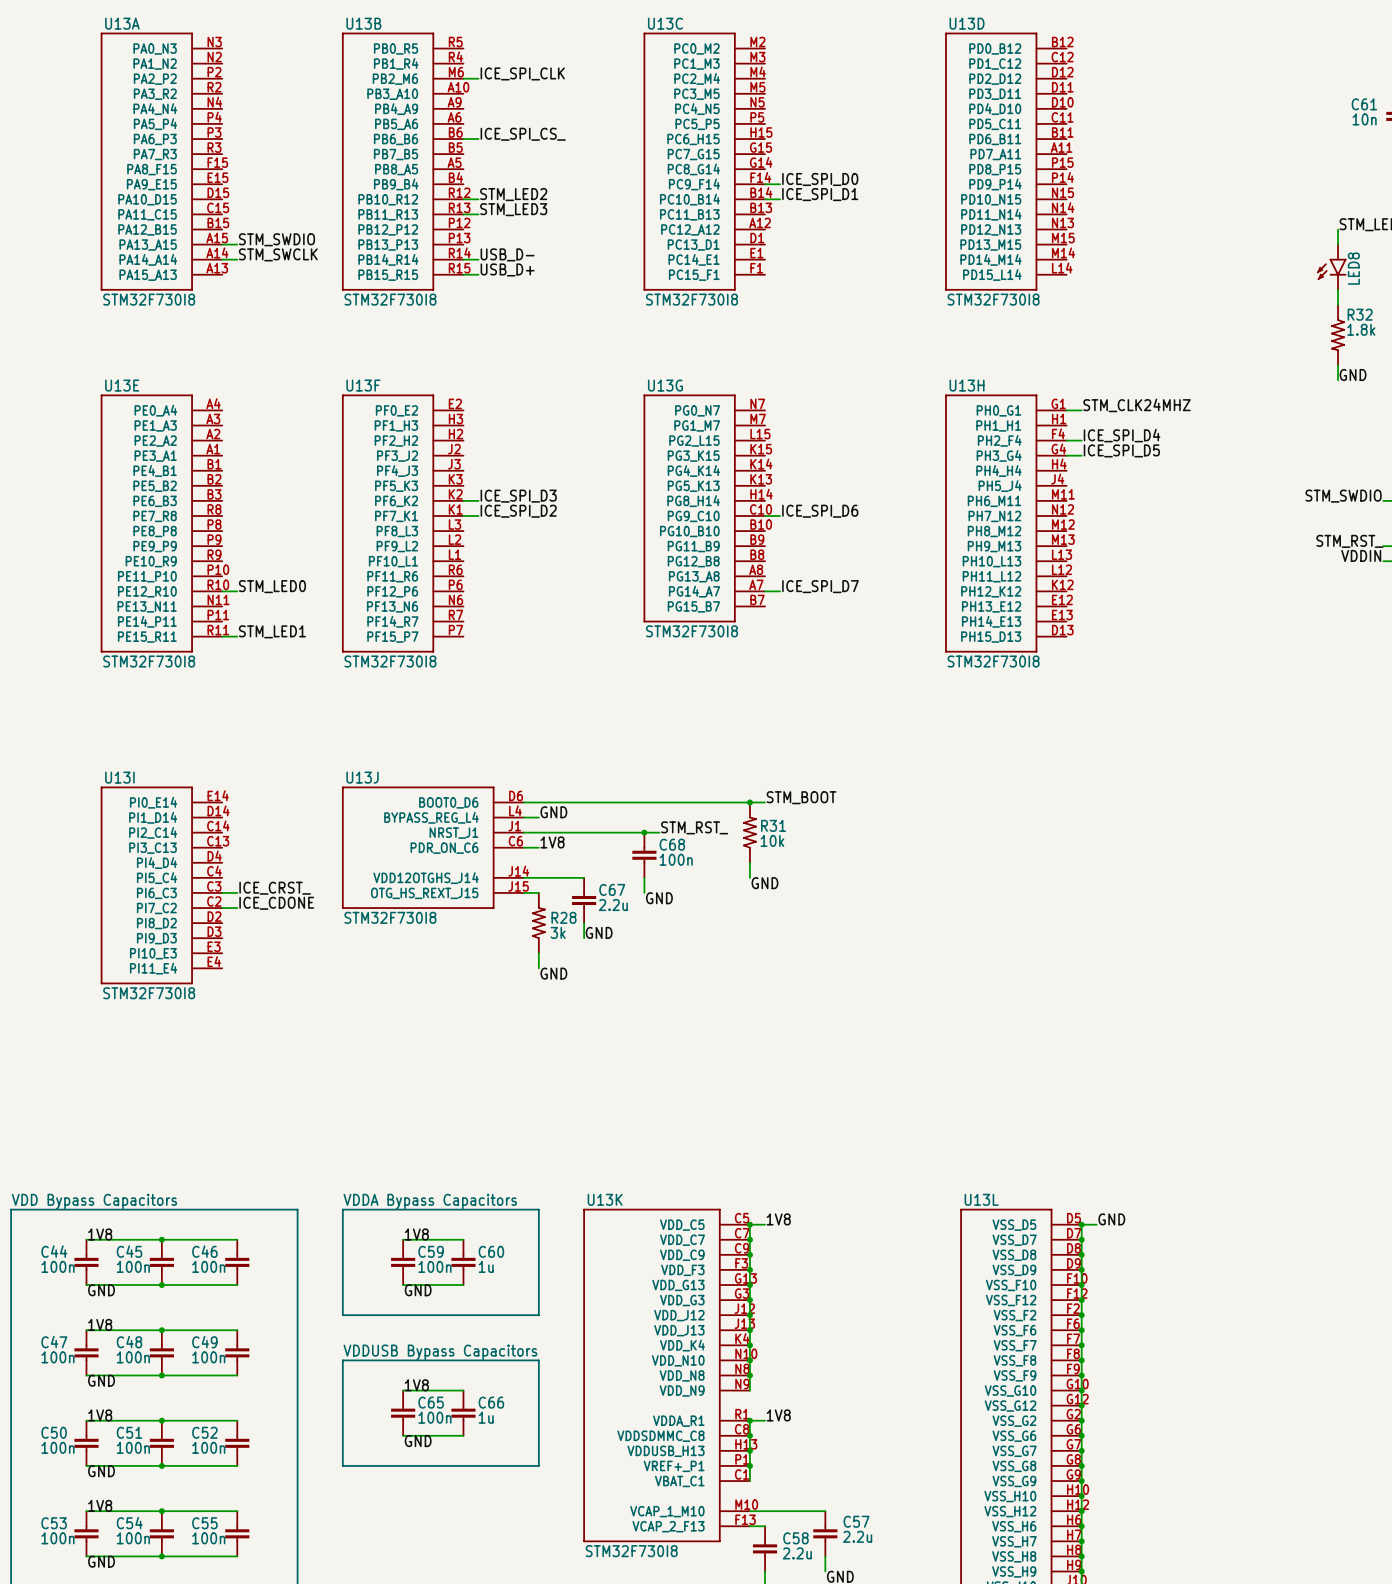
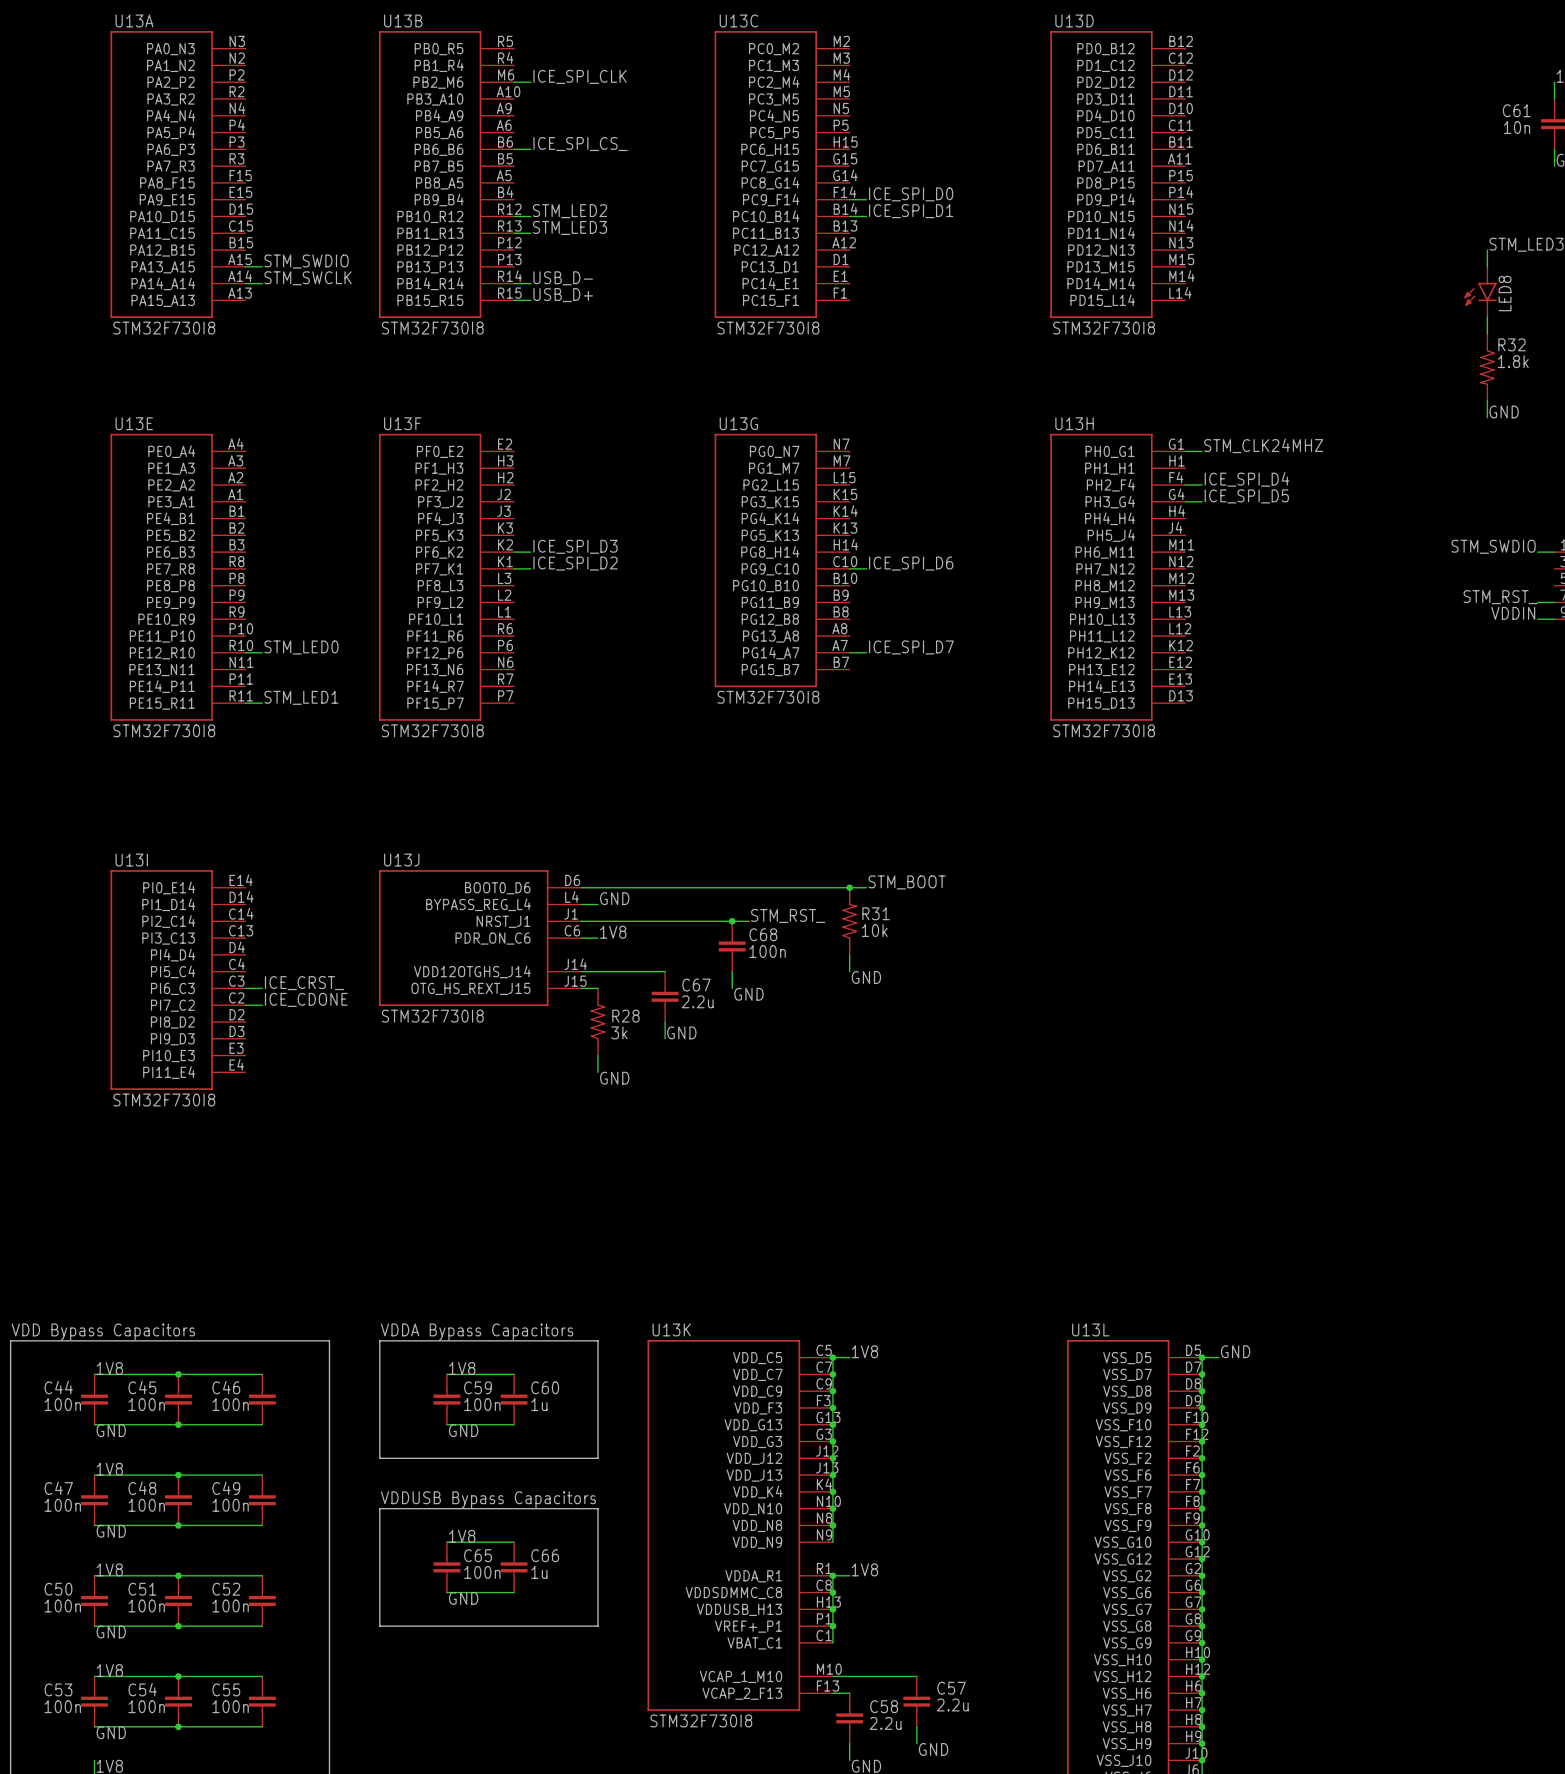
label position: STM_BOOT (801, 797) -> STM_BOOT (907, 882)
junction position: (749, 802) -> (849, 887)
wire: none -> (849, 887) (866, 887)
label position: STM_RST_ (694, 827) -> STM_RST_ (788, 915)
junction position: (644, 832) -> (732, 921)
wire: none -> (732, 921) (749, 921)
R31 position: (749, 832) -> (849, 921)
C68 position: (644, 855) -> (732, 946)
wire: (749, 862) (749, 877) -> (849, 954) (849, 971)
wire: none -> (648, 971) (665, 971)
wire: (644, 877) (644, 892) -> (732, 971) (732, 988)
label position: GND (764, 883) -> GND (866, 977)
label position: GND (659, 898) -> GND (748, 994)
C67 position: (584, 900) -> (665, 996)
wire: (584, 923) (584, 938) -> (665, 1021) (665, 1038)
label position: GND (599, 932) -> GND (681, 1032)

